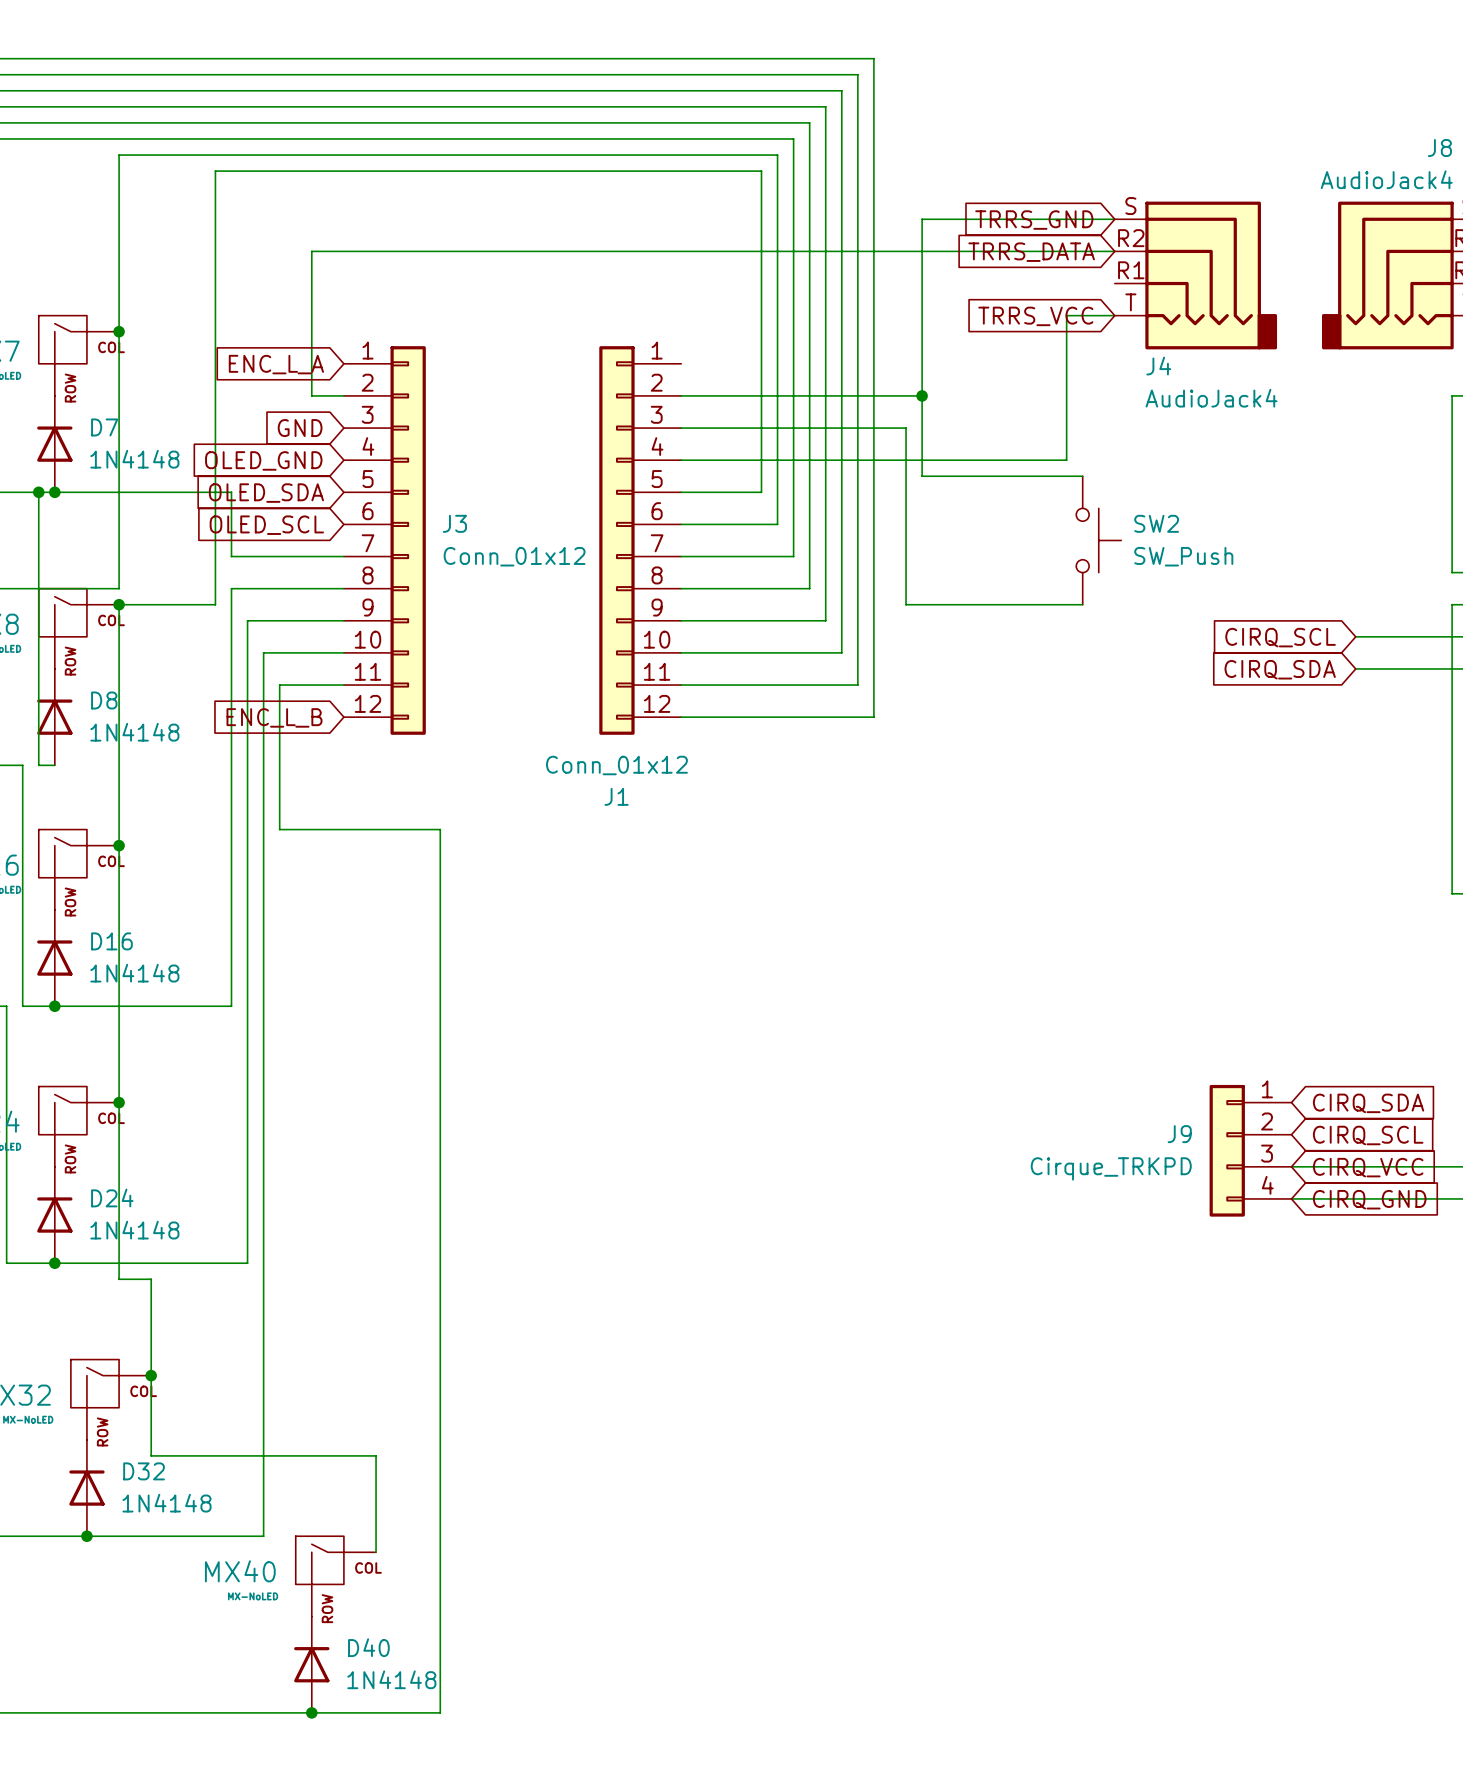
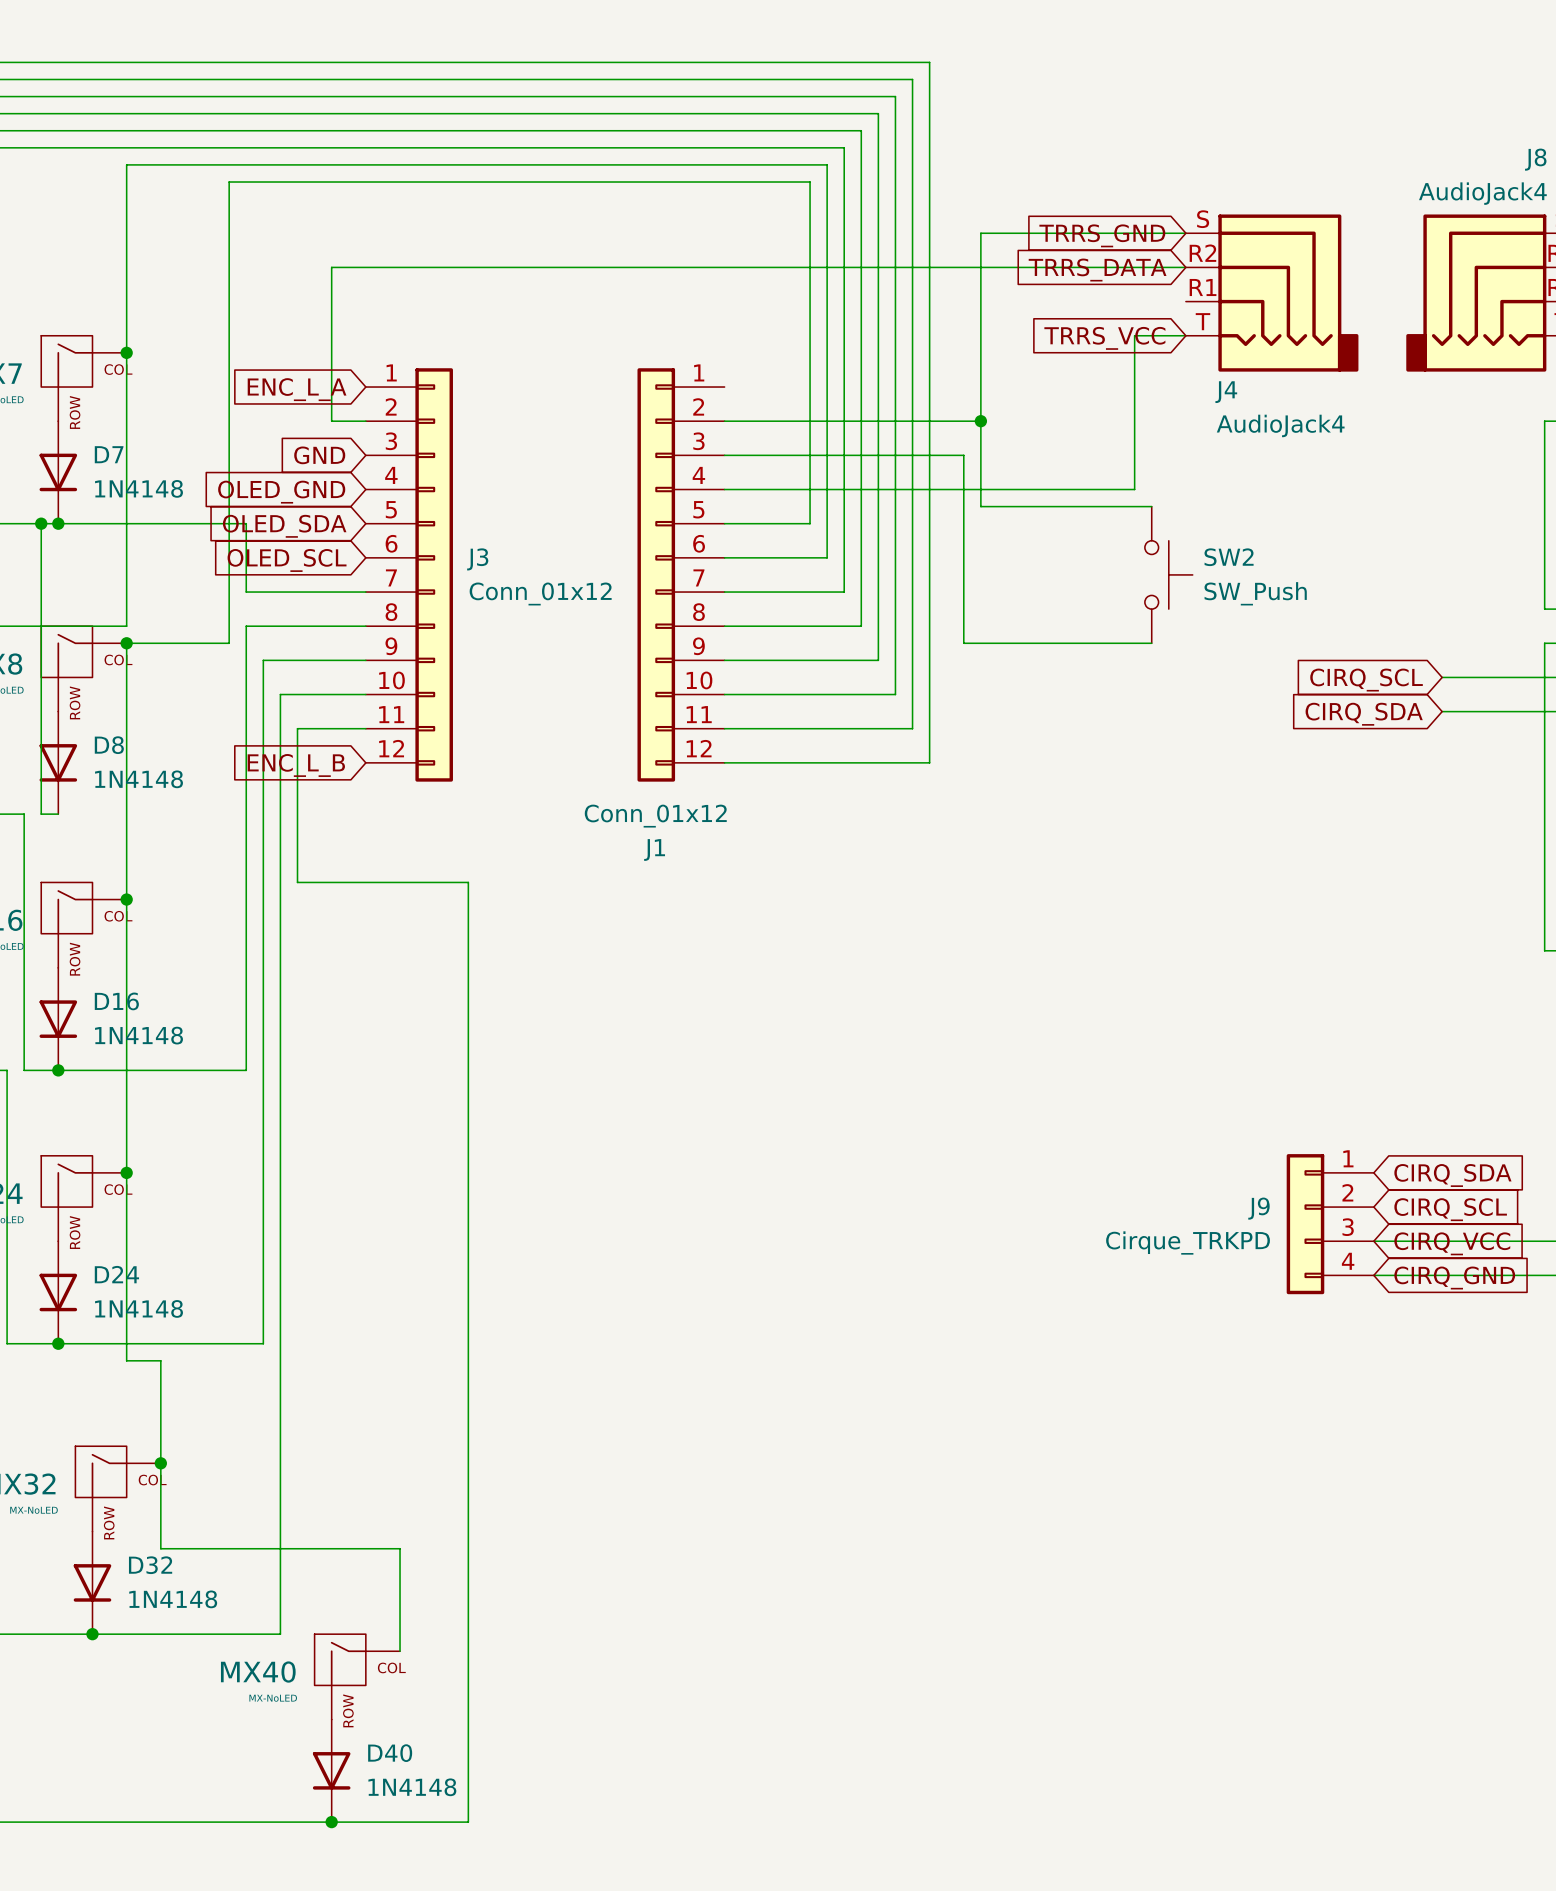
D7 rotation: 0° (54, 444) -> 180° (58, 472)
D8 rotation: 0° (54, 717) -> 180° (58, 762)
D16 rotation: 0° (54, 958) -> 180° (58, 1019)
D24 rotation: 0° (54, 1215) -> 180° (58, 1292)
D32 rotation: 0° (86, 1488) -> 180° (92, 1582)
D40 rotation: 0° (311, 1664) -> 180° (331, 1770)

